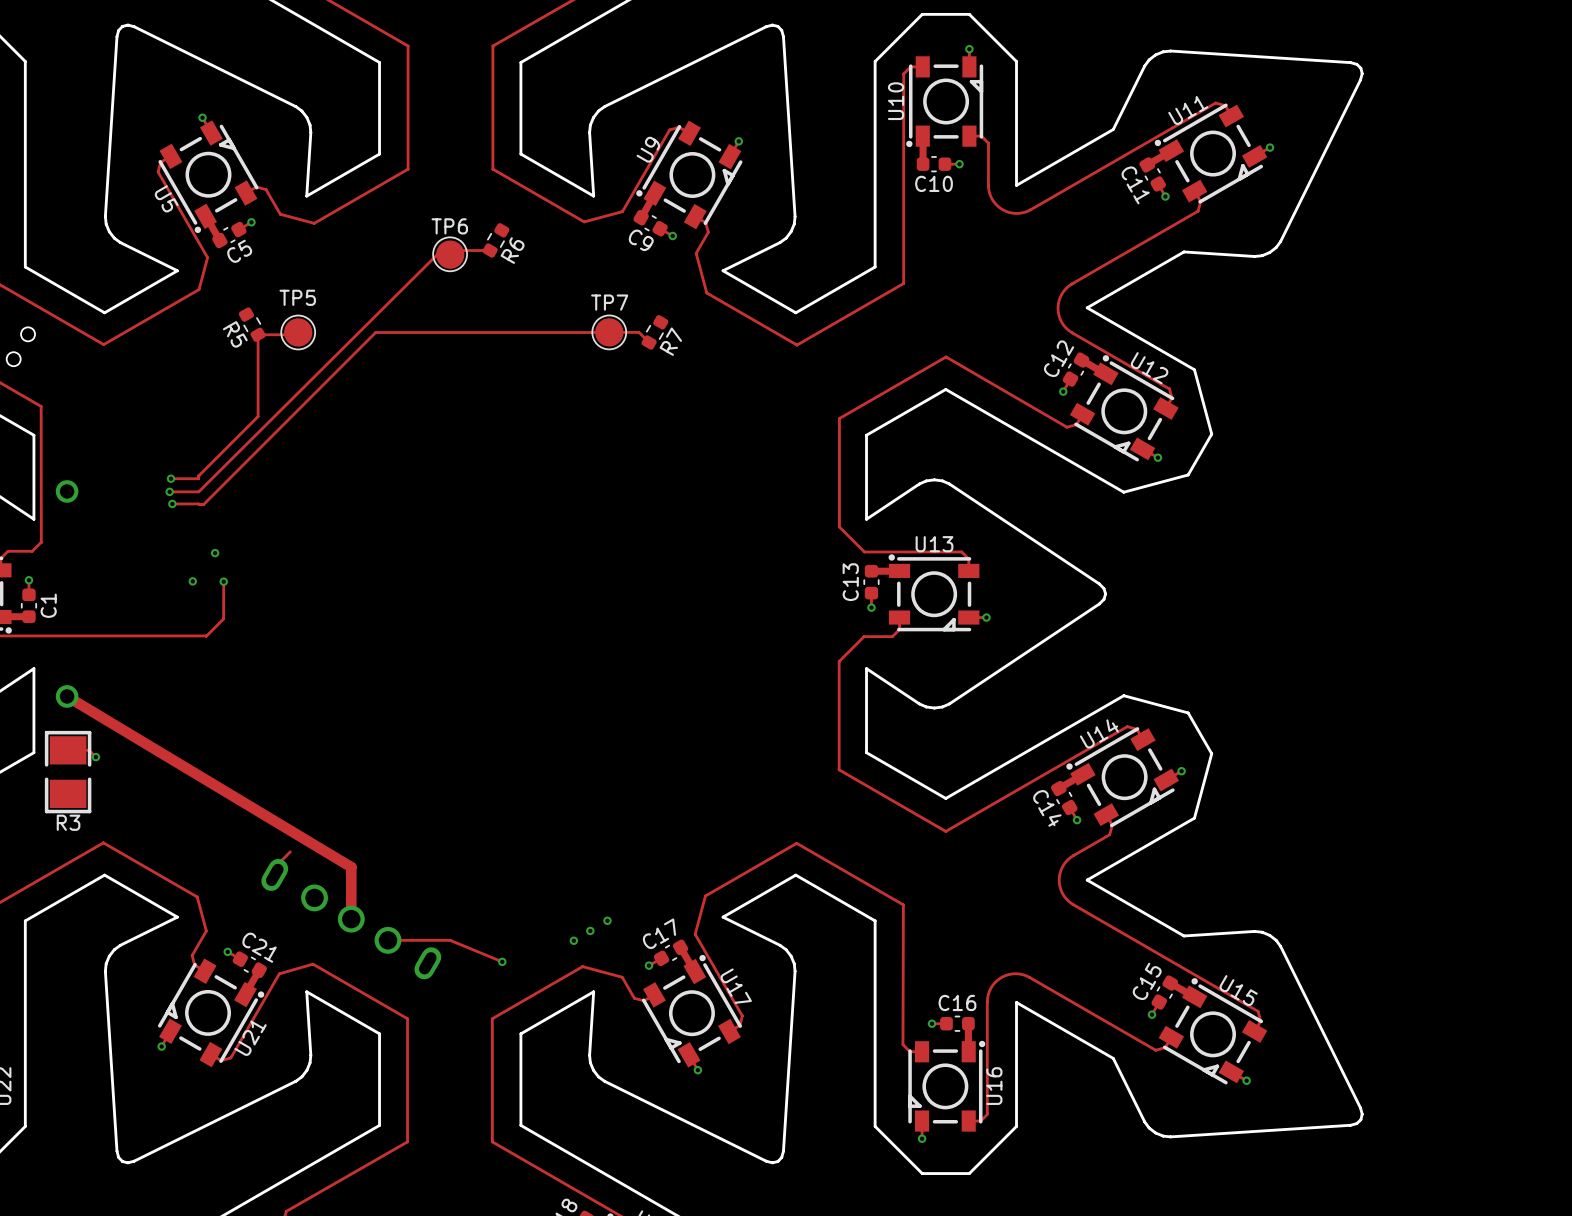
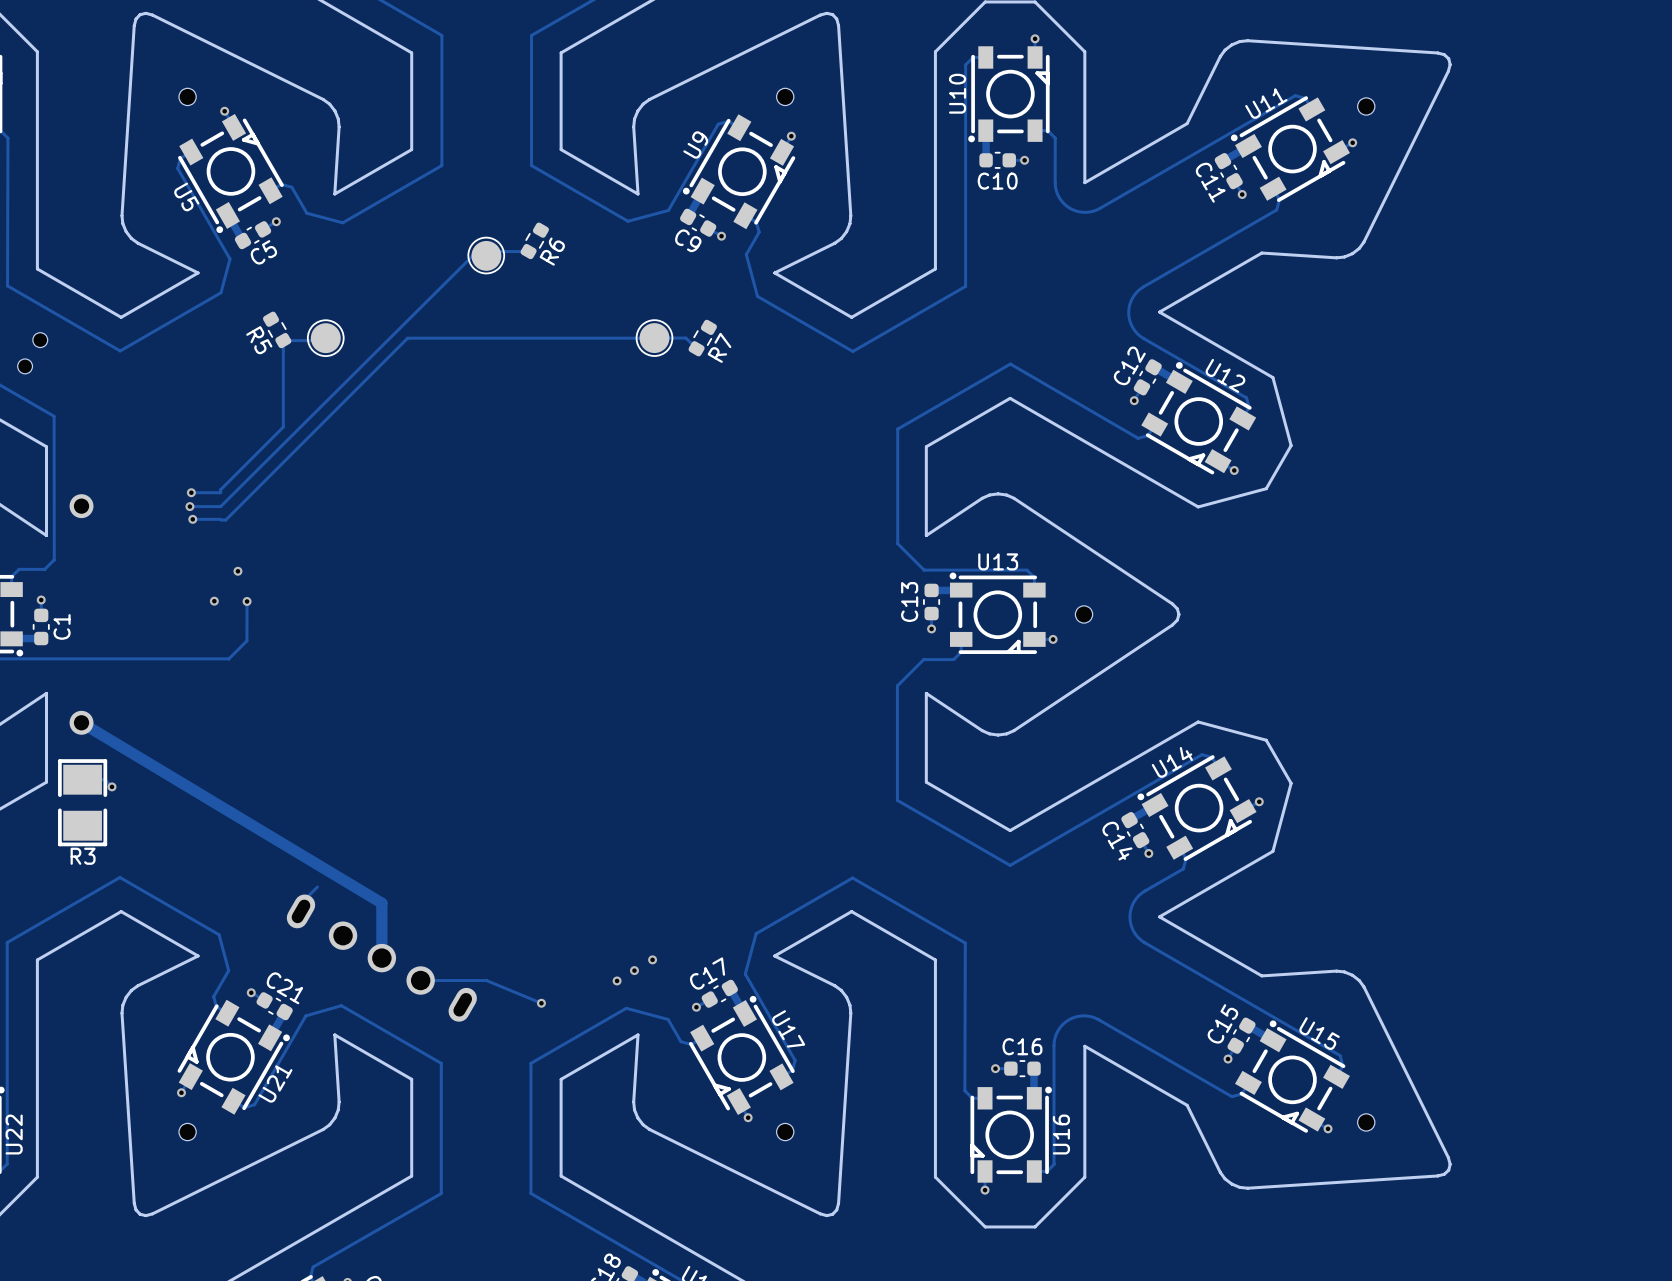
part: none -> (187, 96)
part: none -> (785, 96)
part: none -> (1366, 106)
TP6 name: TP6 (449, 226) -> none
TP5 name: TP5 (297, 297) -> none
TP7 name: TP7 (609, 302) -> none
part: none -> (1084, 614)
part: none -> (1366, 1122)
part: none -> (187, 1132)
part: none -> (785, 1132)

